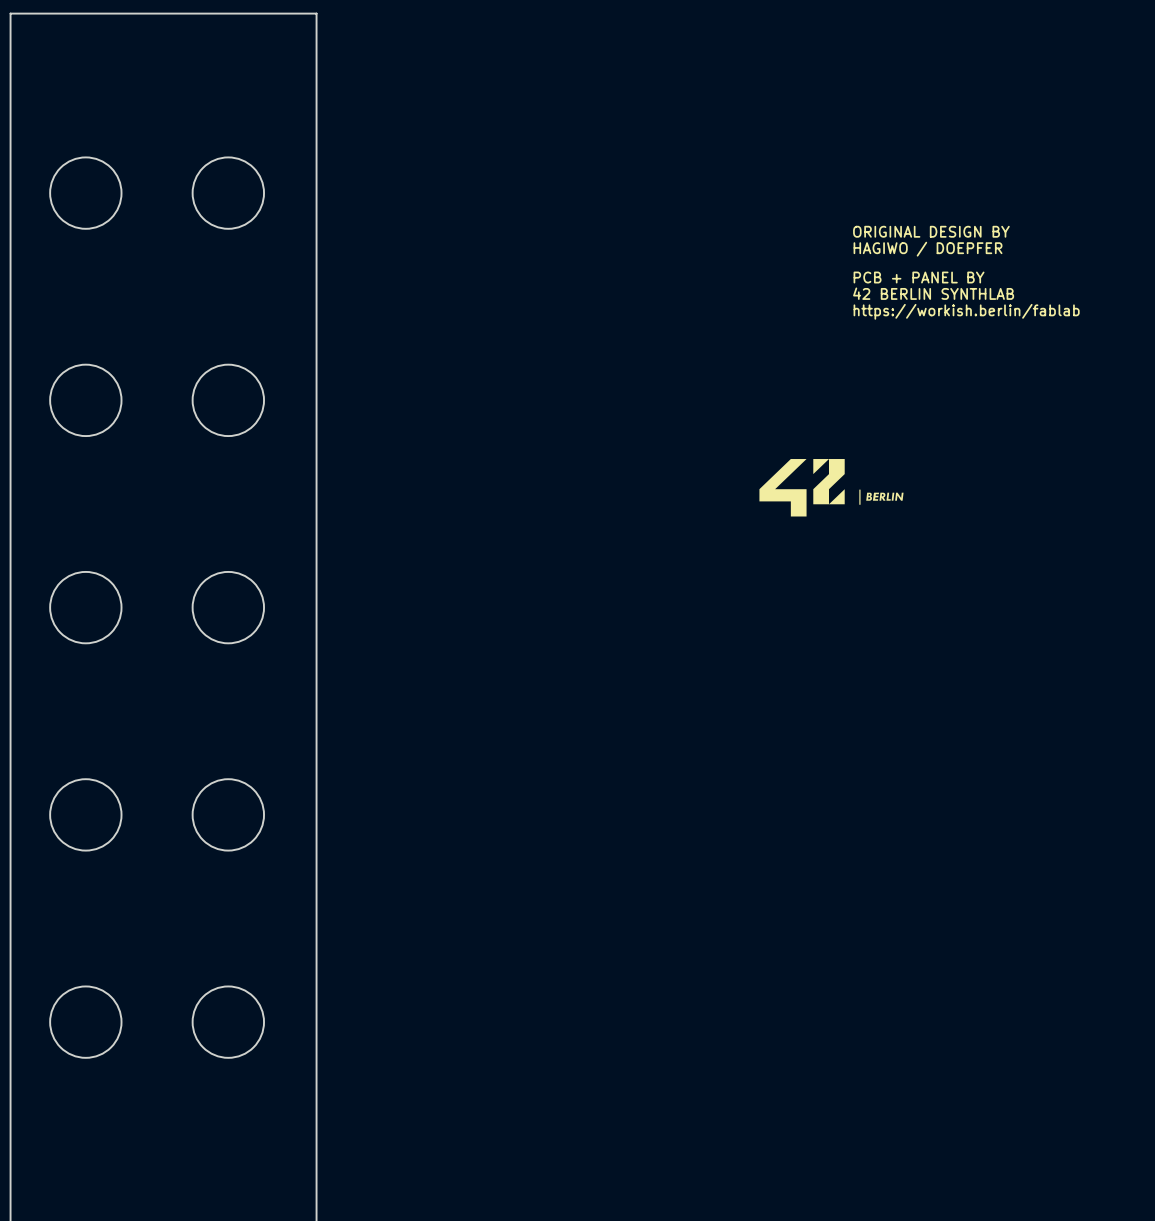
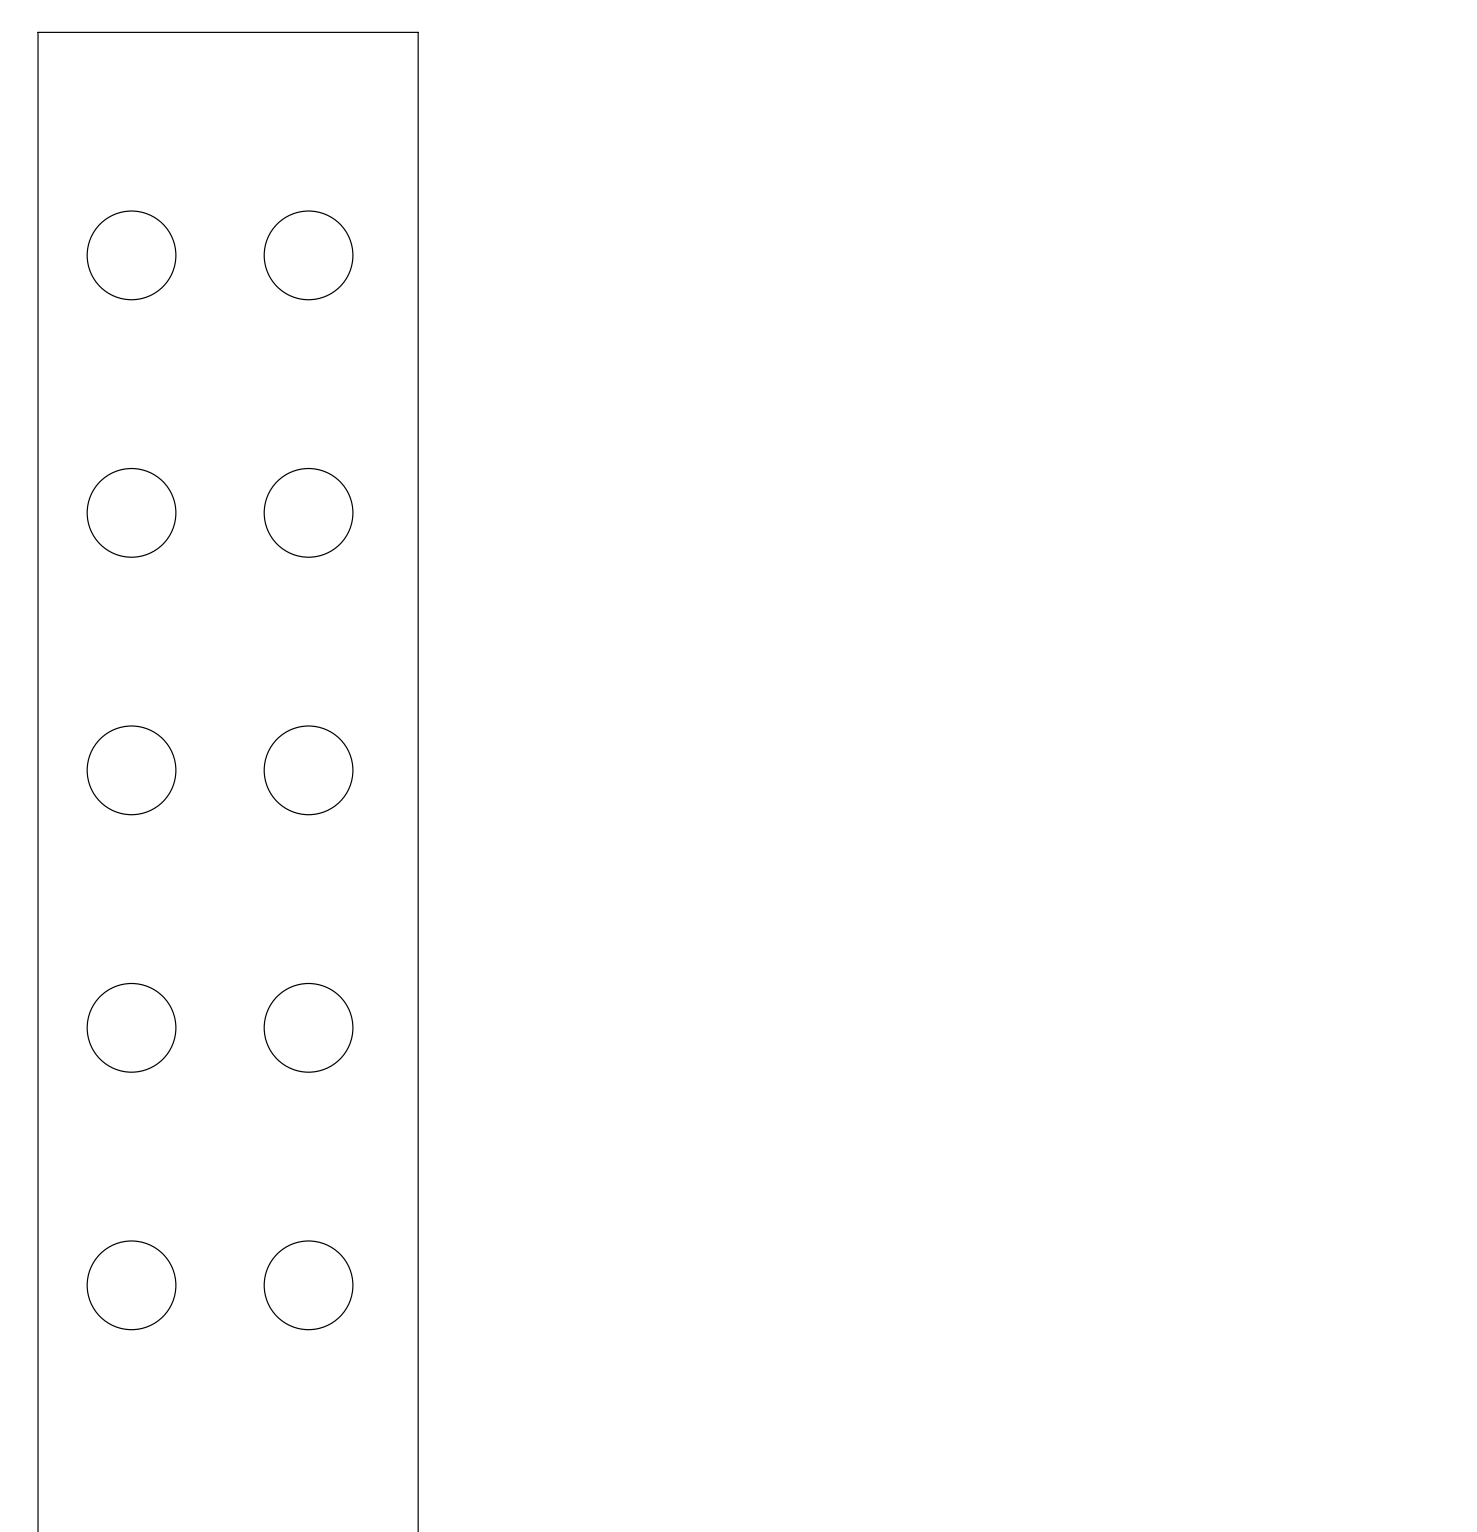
text: ORIGINAL DESIGN BY (931, 231) -> none
text: HAGIWO / DOEPFER (928, 249) -> none
text: PCB + PANEL BY (919, 277) -> none
text: 42 BERLIN SYNTHLAB (933, 293) -> none
text: https://workish.berlin/fablab (966, 311) -> none
drawing: [759, 459, 845, 517] -> none
drawing: [859, 489, 904, 505] -> none

